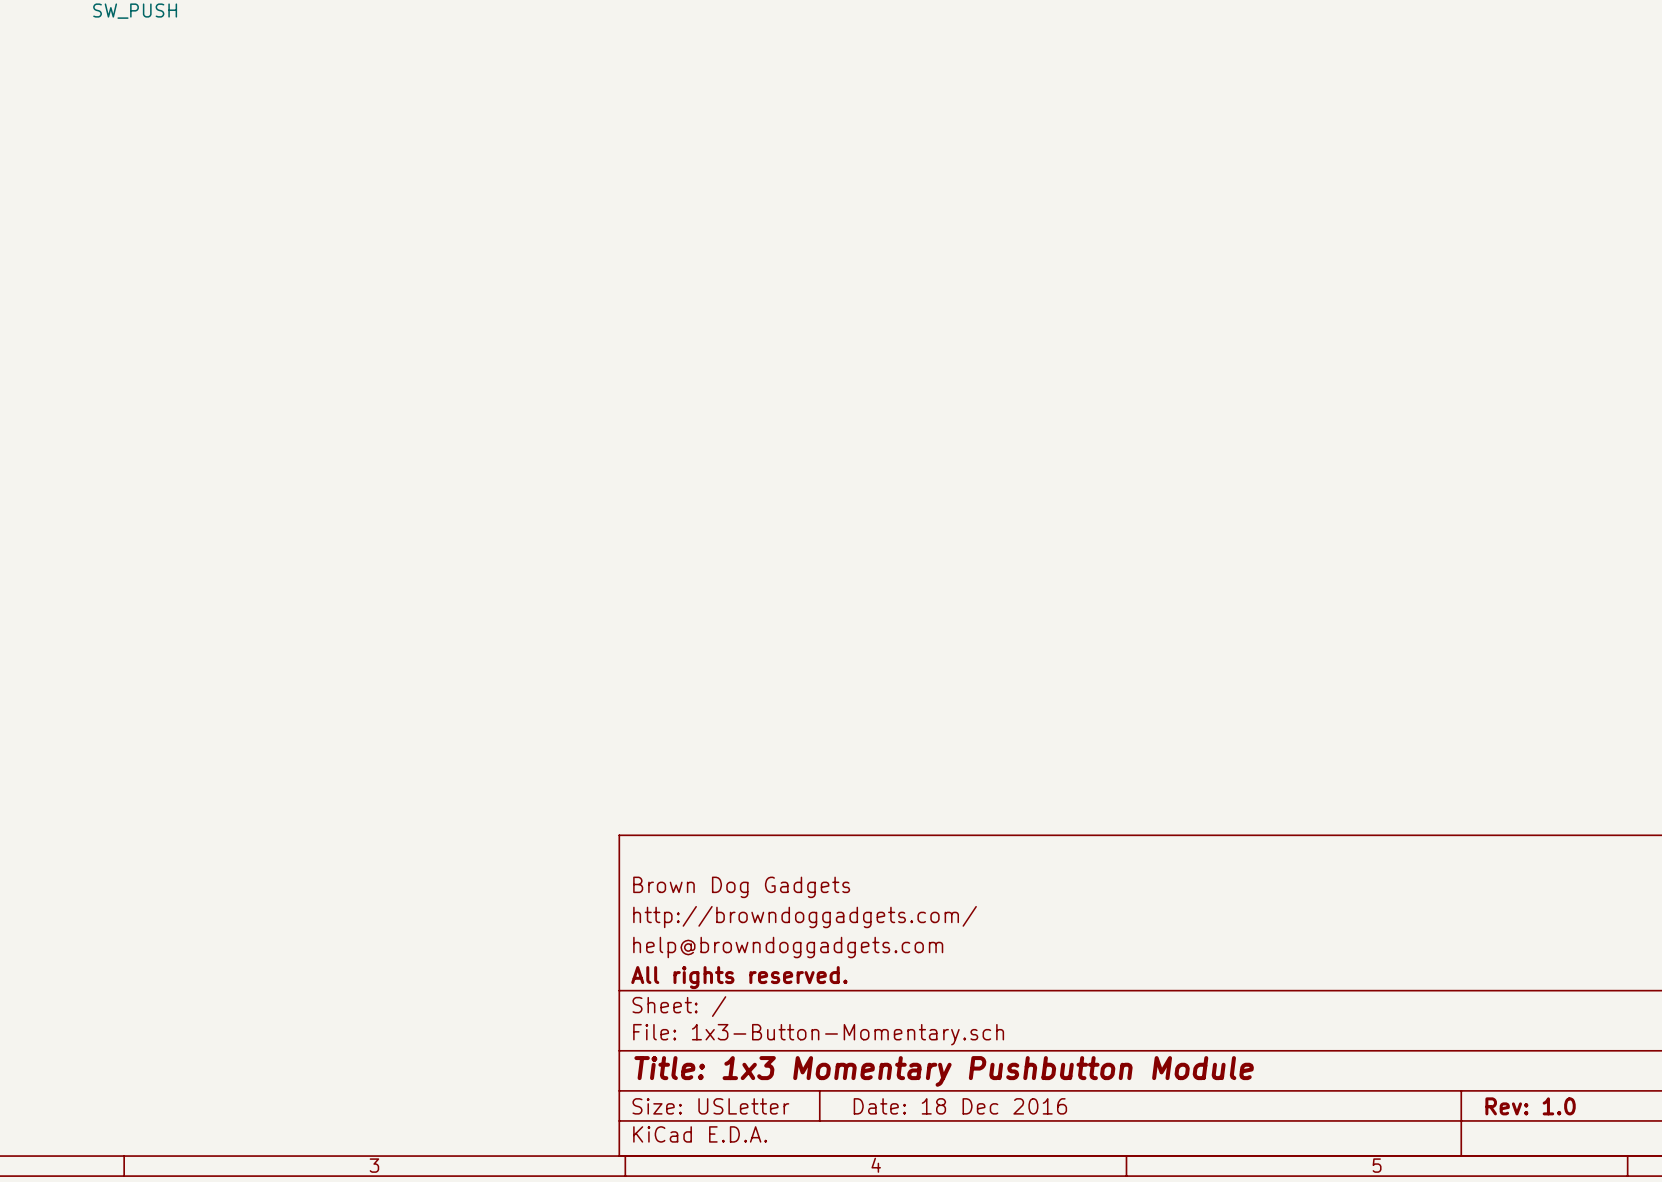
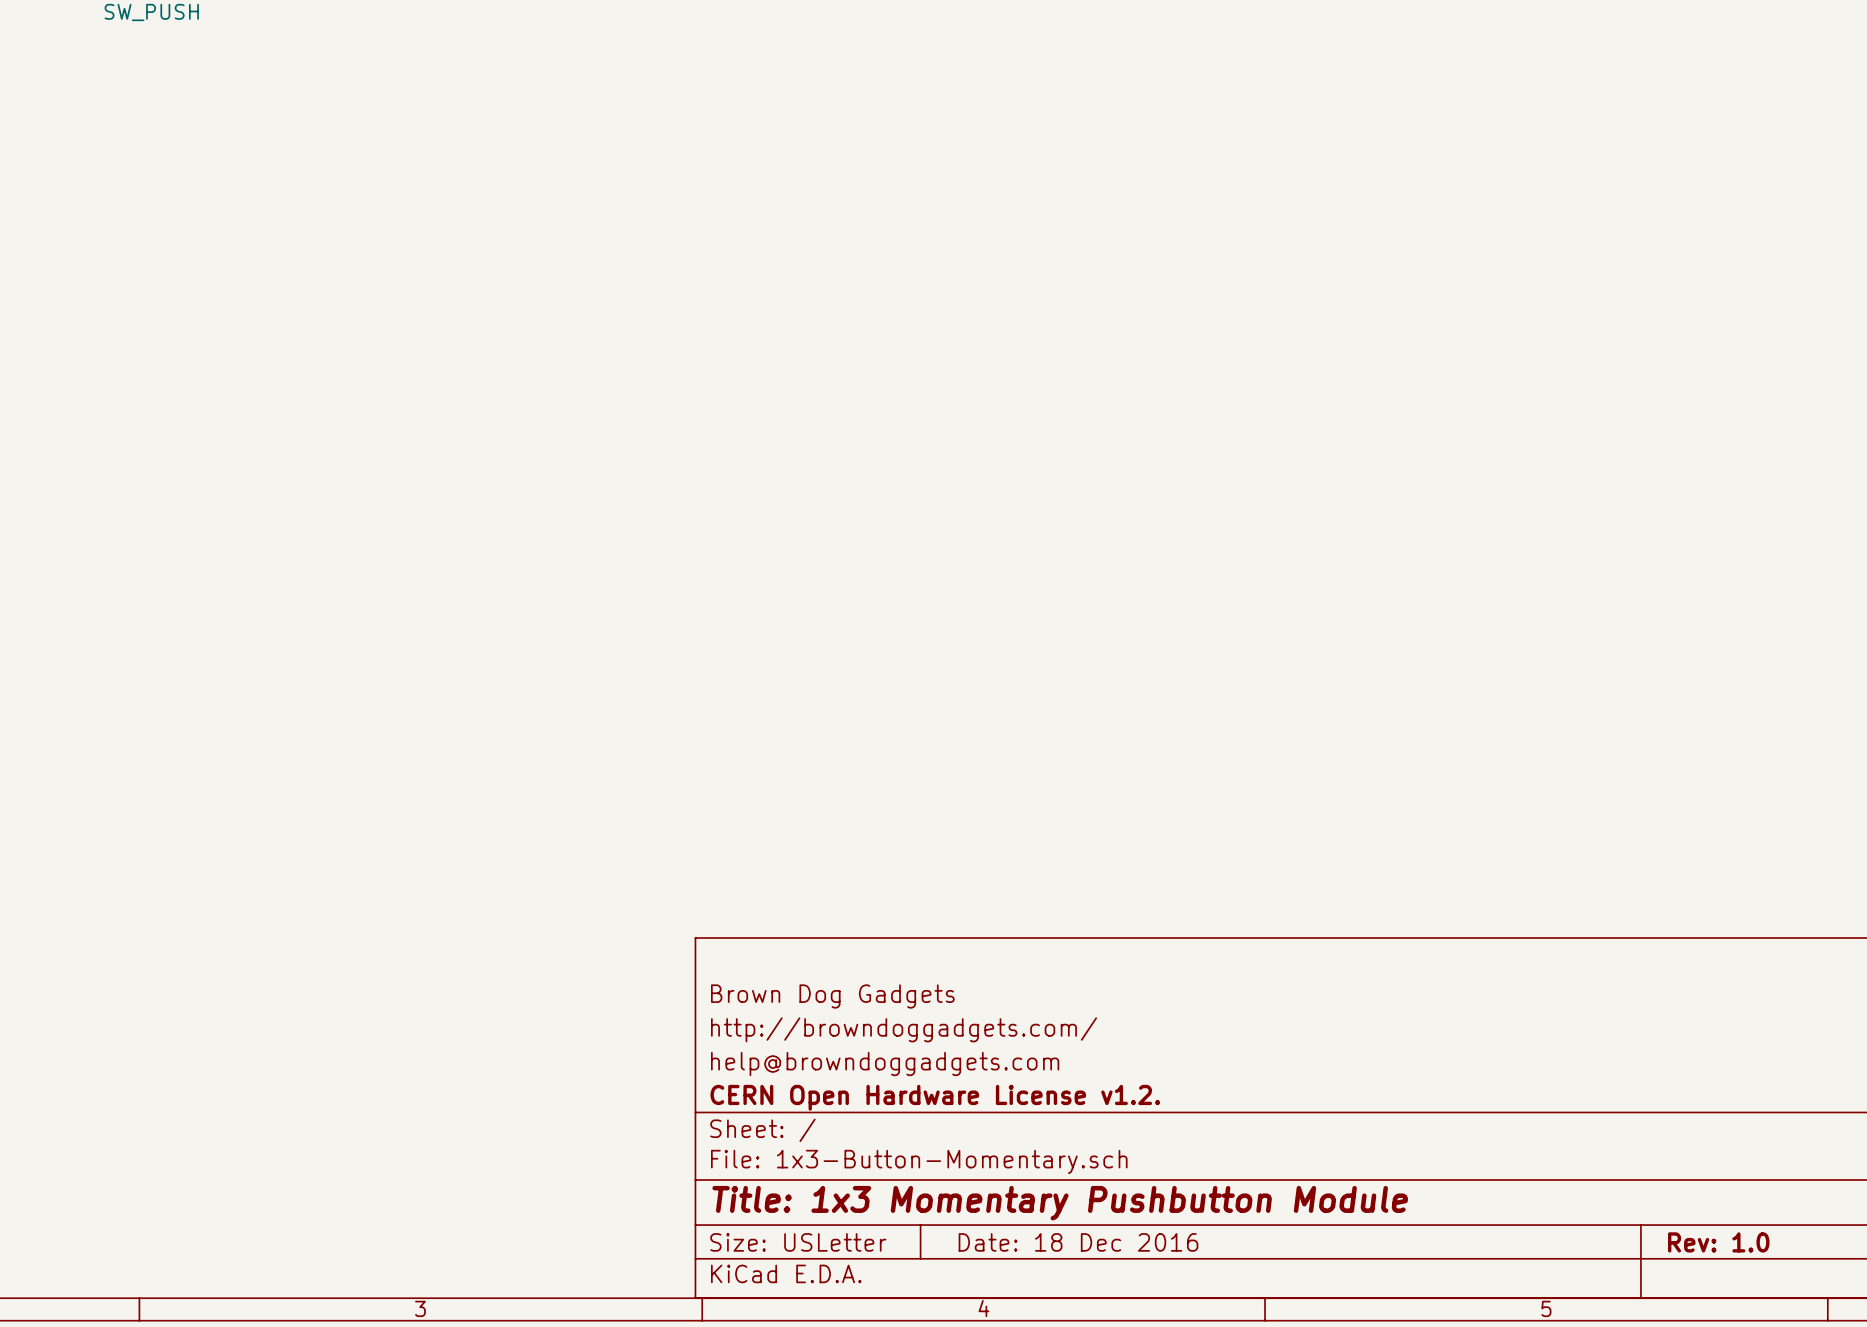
title block: All rights reserved. (739, 977) -> CERN Open Hardware License v1.2. (935, 1097)

